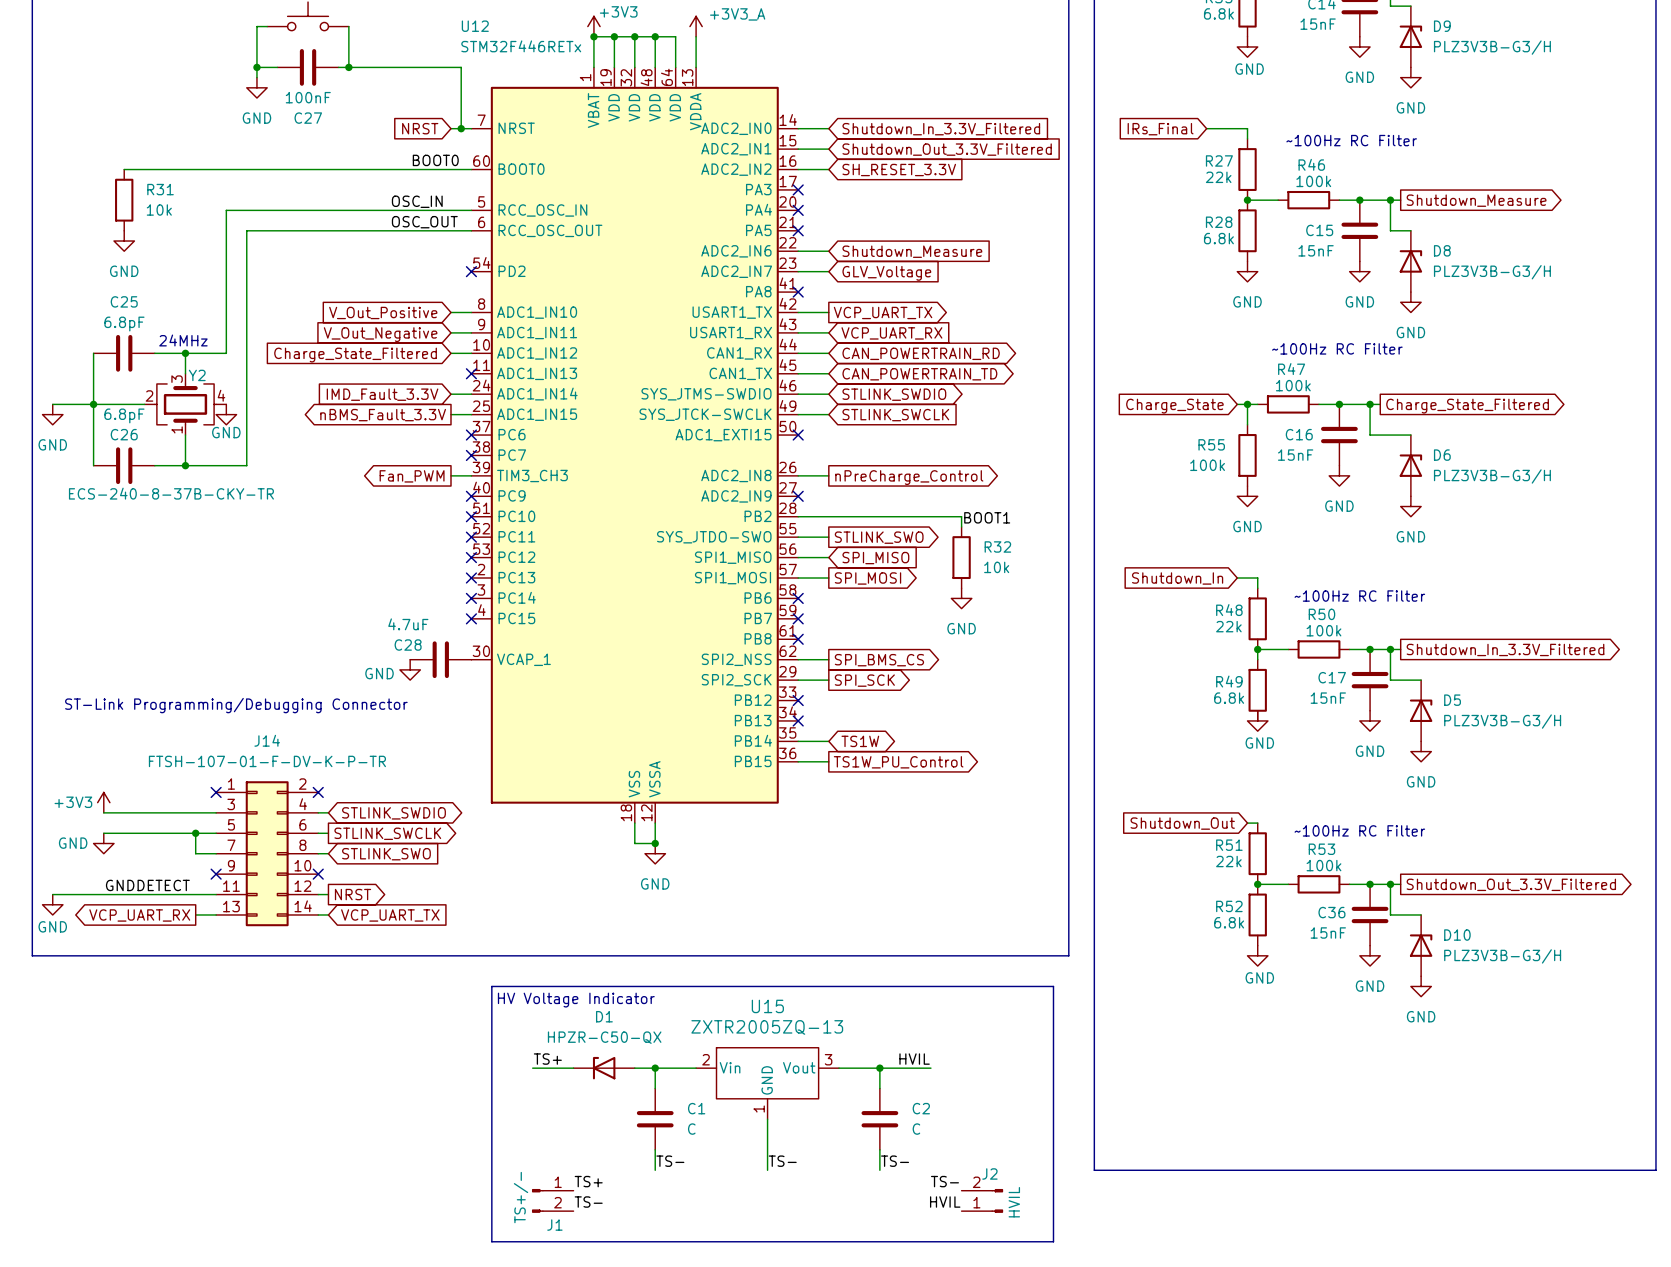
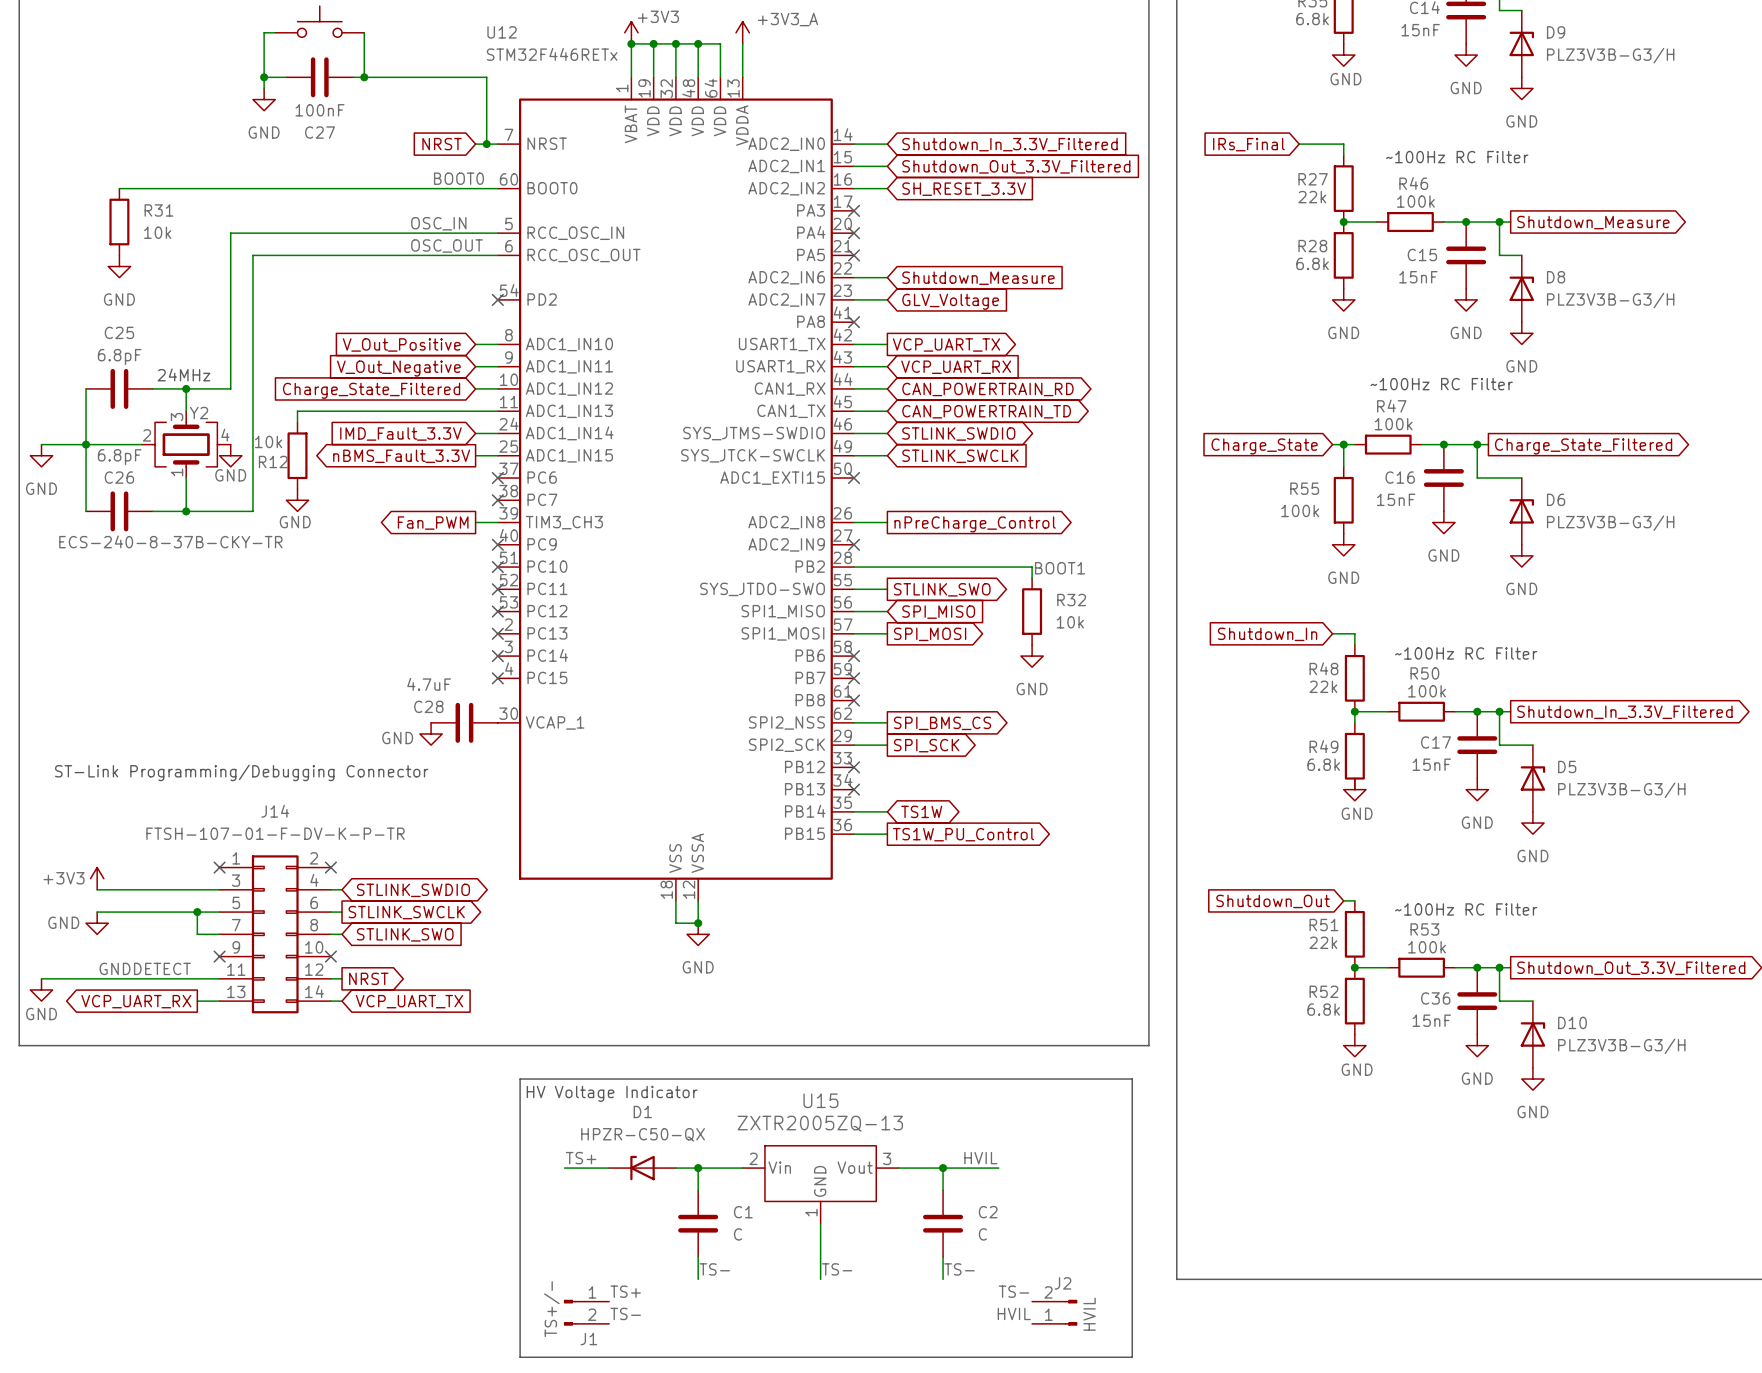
wire: none -> (497, 411) (297, 411) (297, 422)
no-connect mark: (471, 373) -> none
R12: none -> 10k (297, 455)
power symbol: none -> GND (297, 500)

